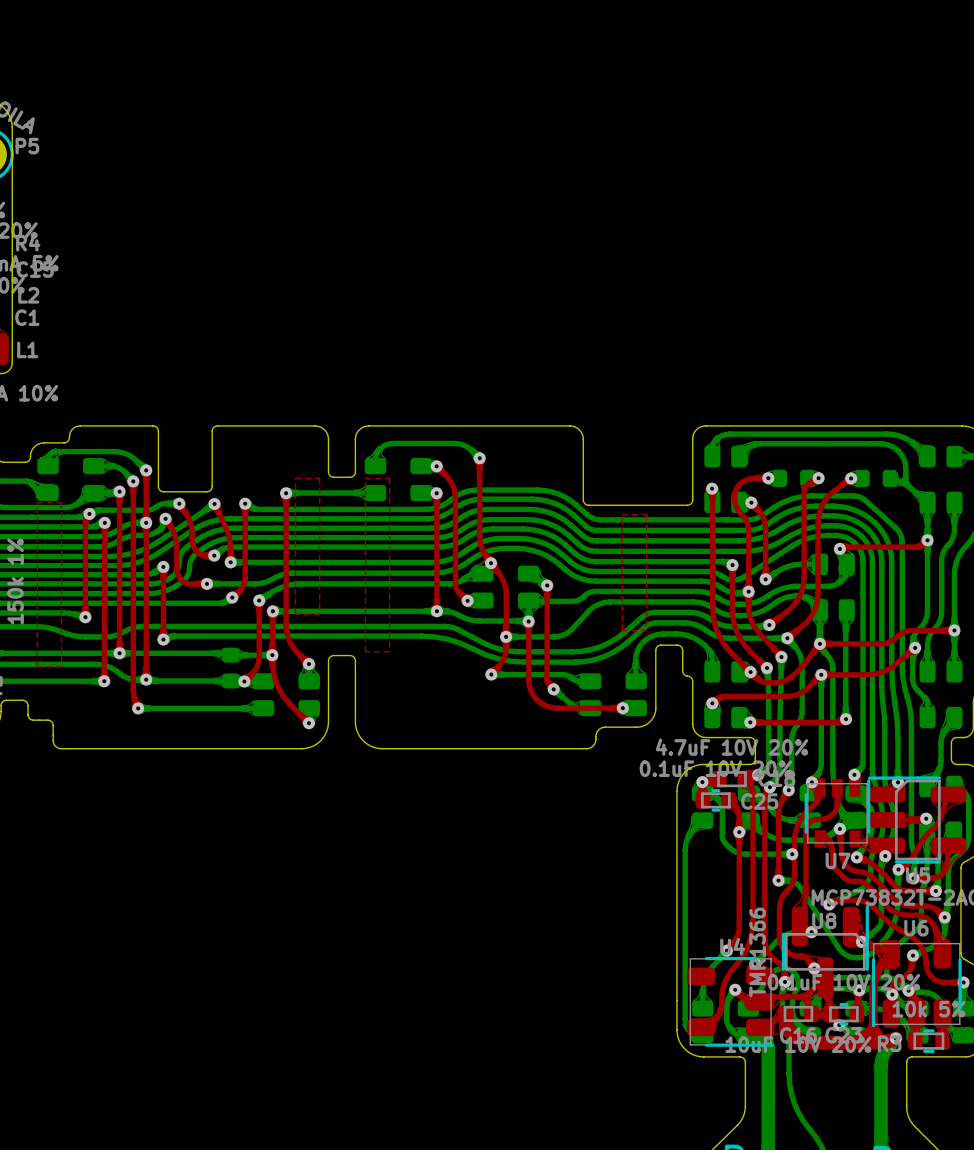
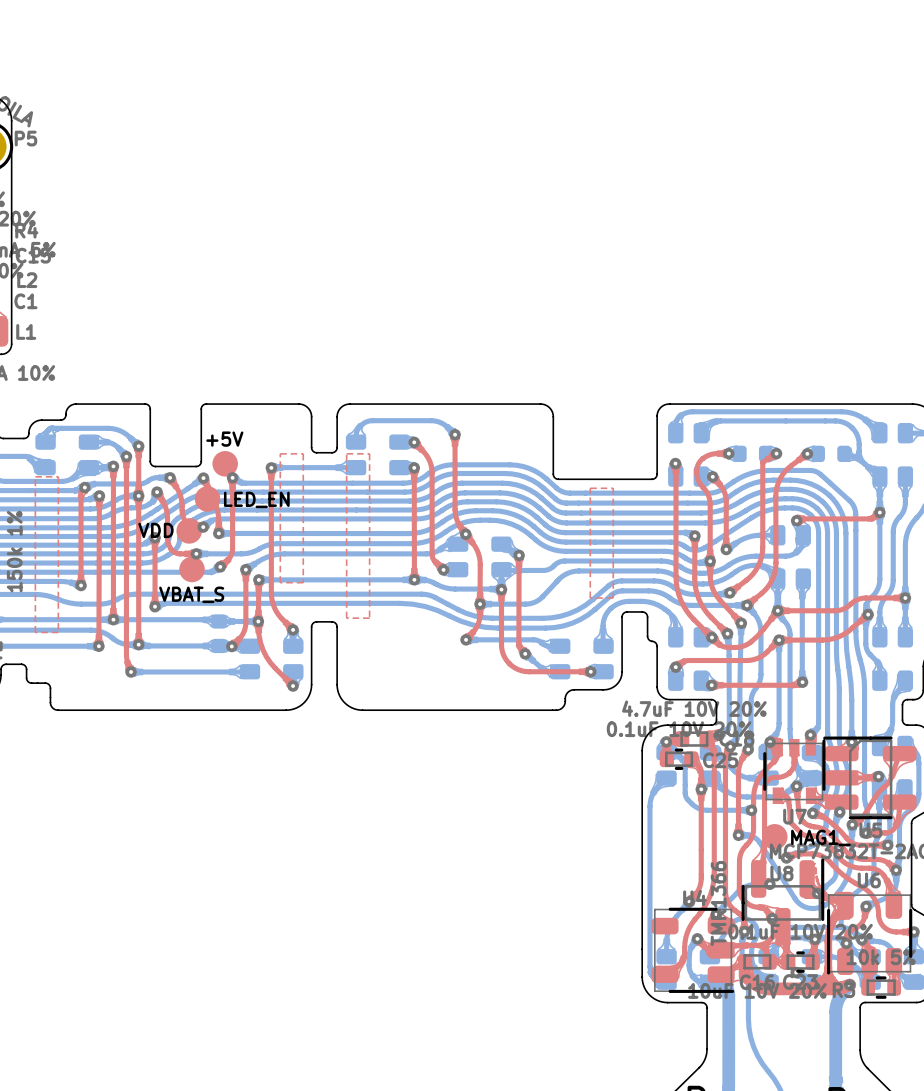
part: none -> +5V (225, 463)
part: none -> LED_EN (207, 499)
part: none -> VDD (189, 530)
part: none -> VBAT_S (192, 569)
part: none -> MAG1_ (774, 836)

